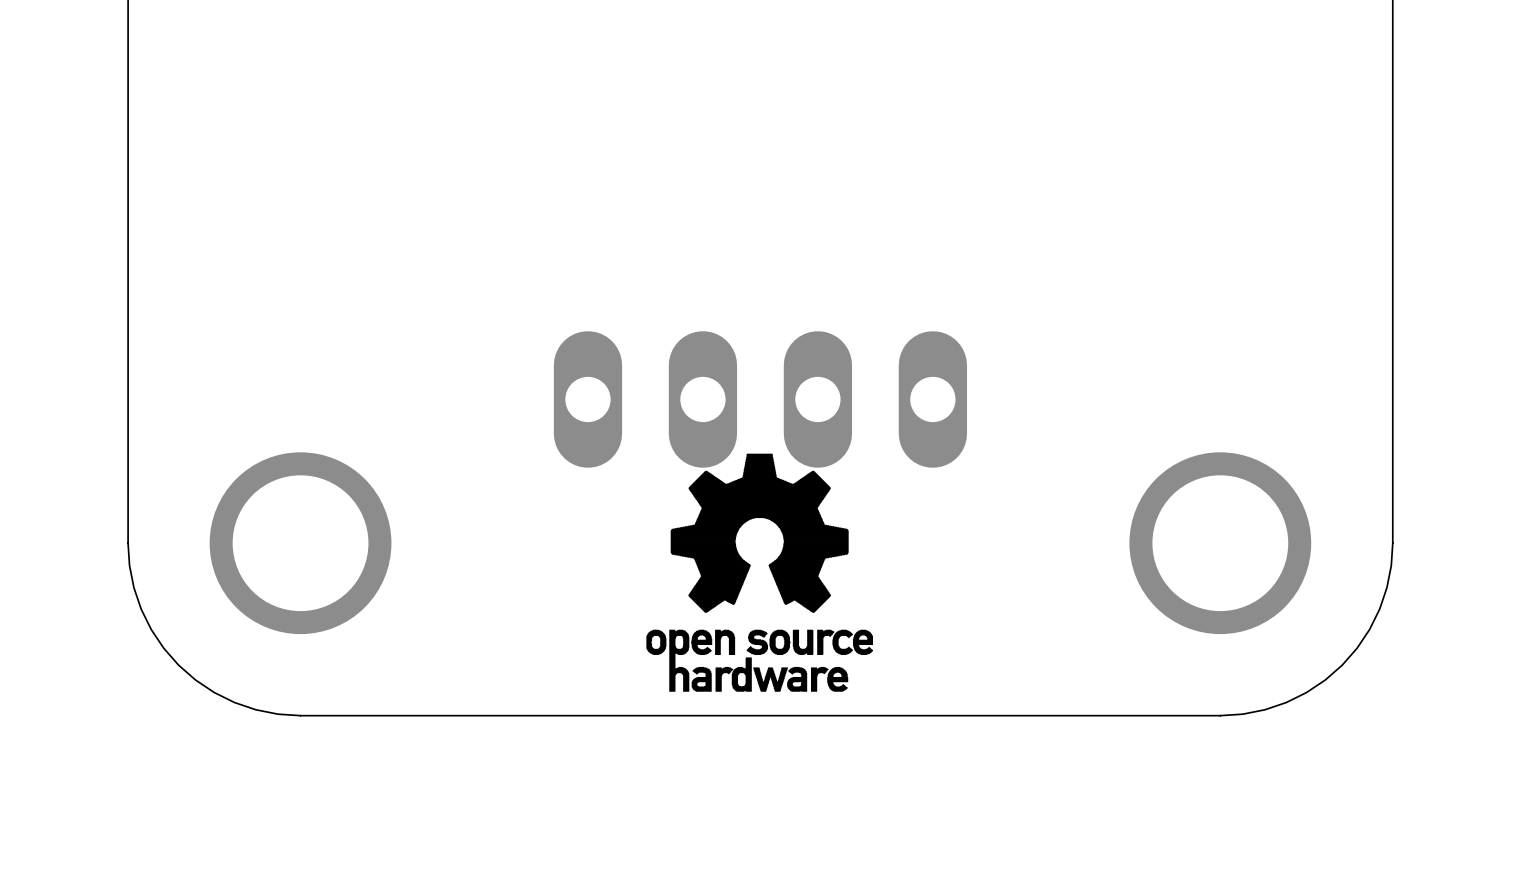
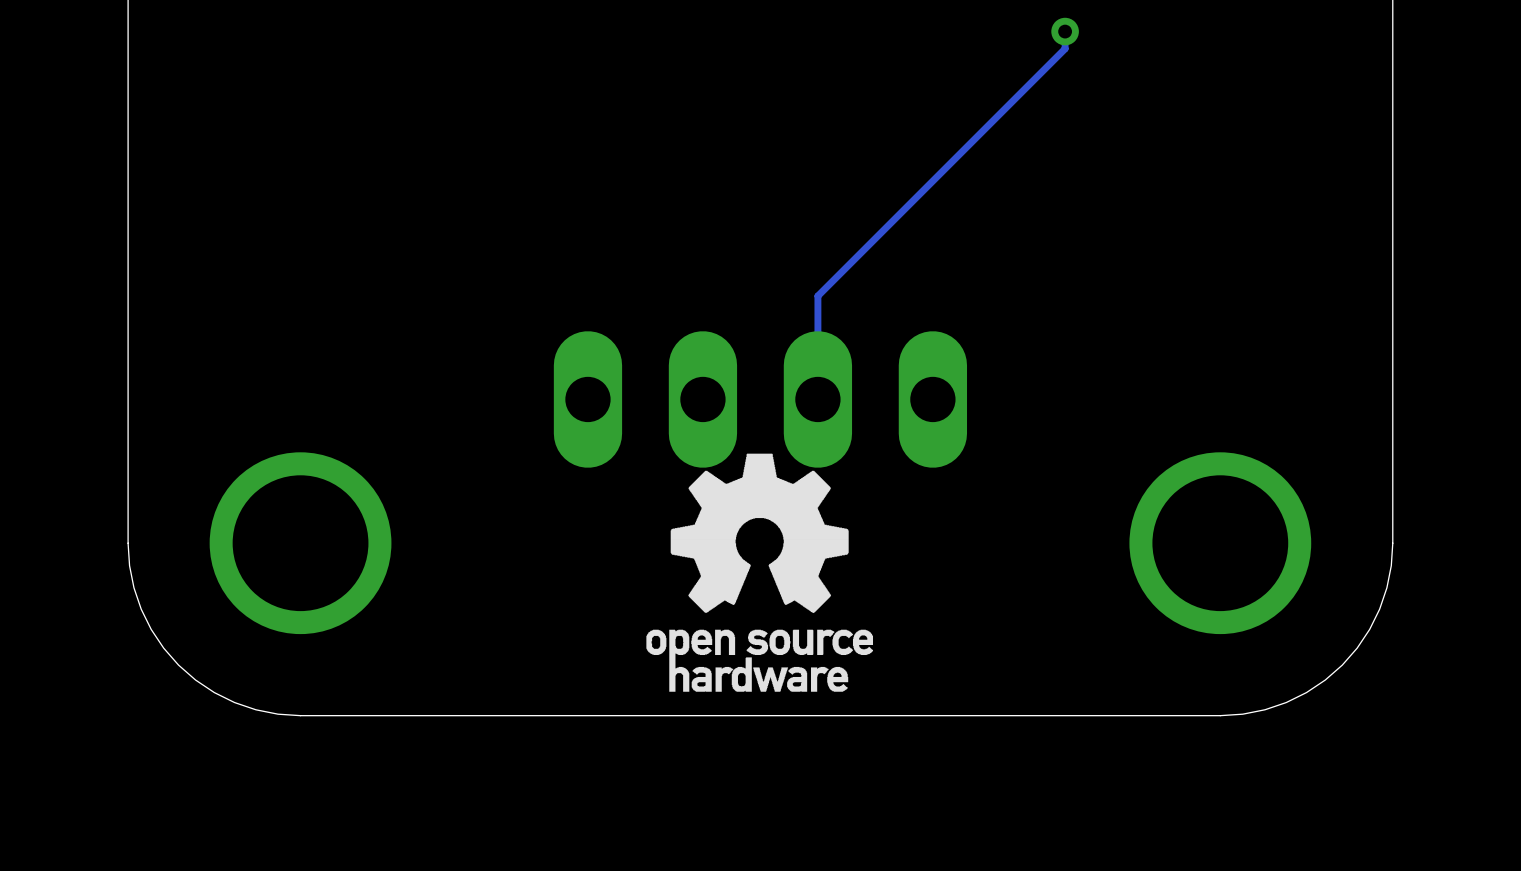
track: none -> (1065, 31) (1065, 48) (817, 296) (817, 399)
via: none -> (1065, 31)

